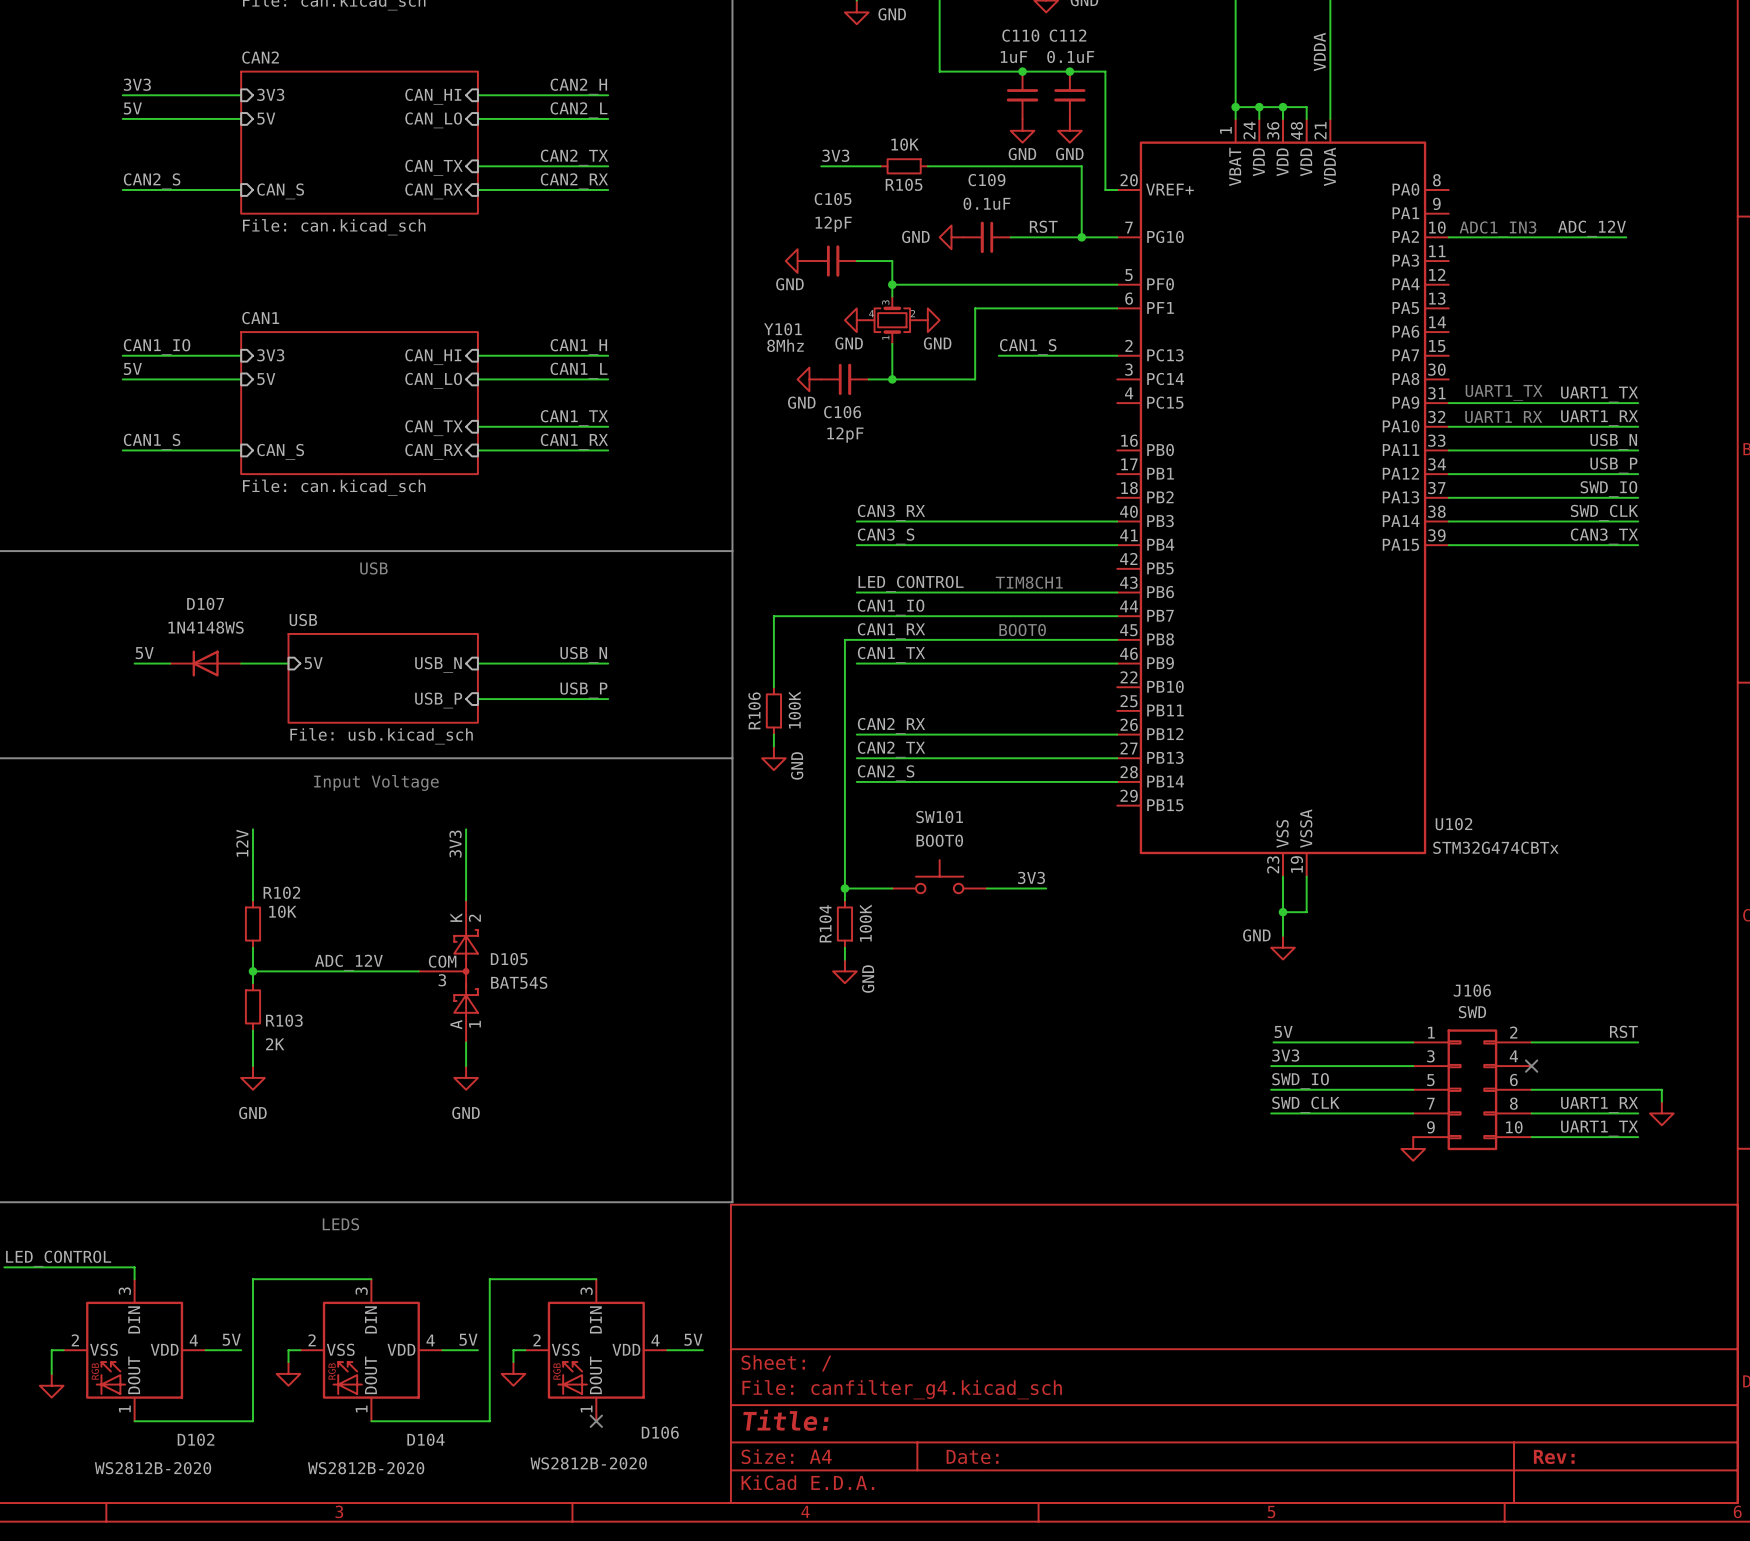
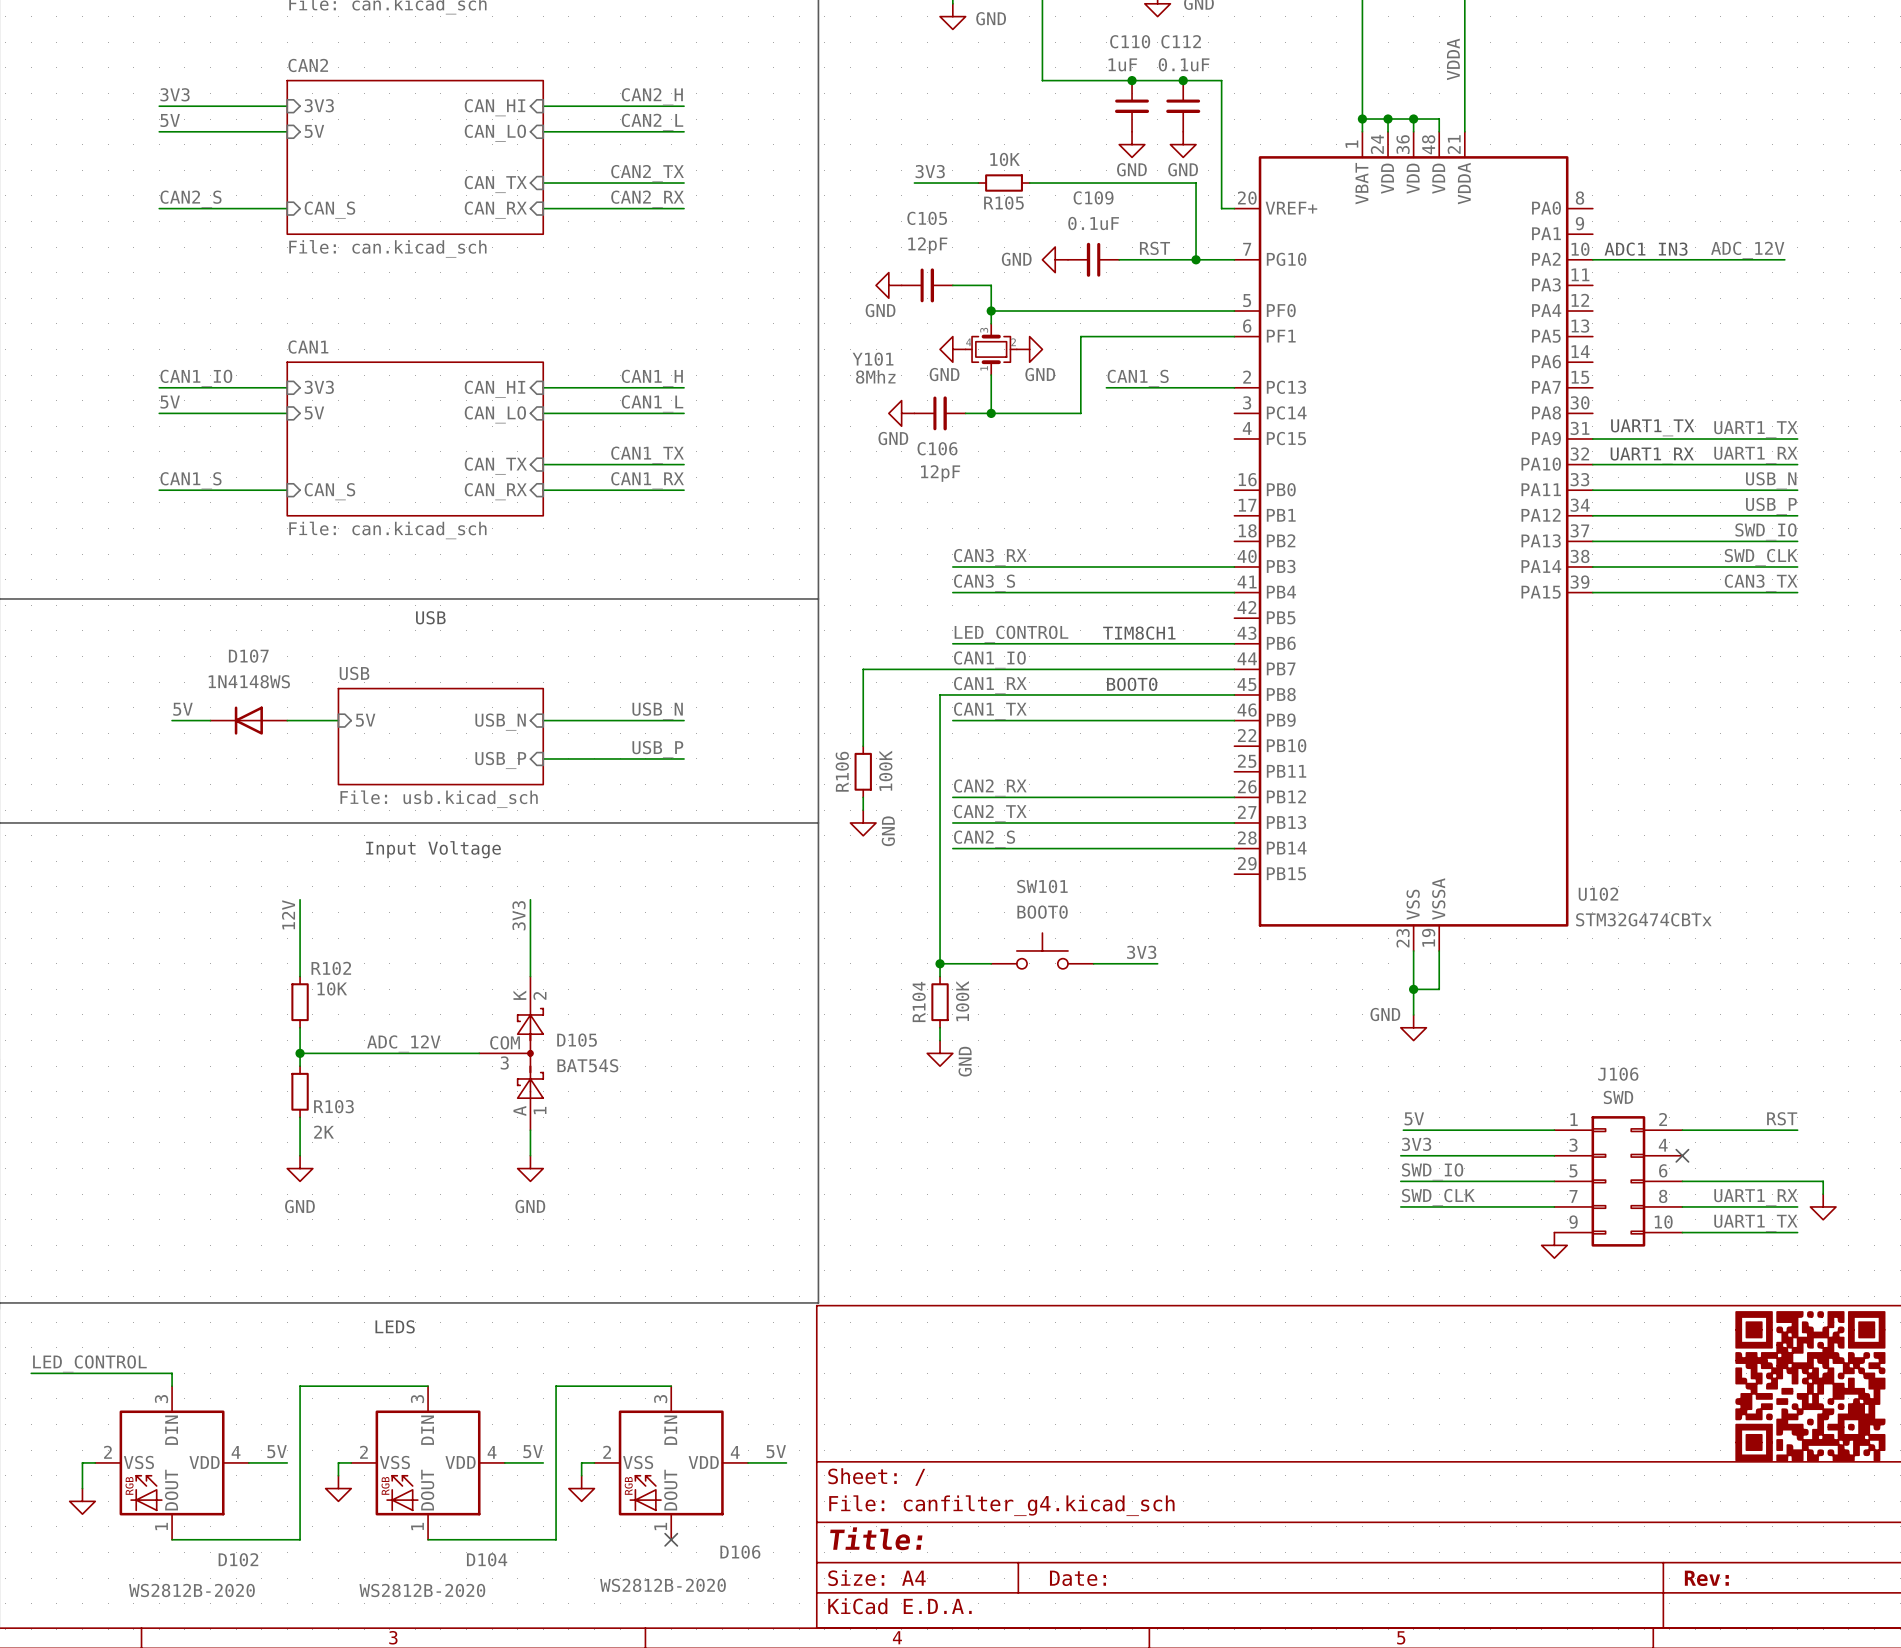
power symbol: none -> (1810, 1386)

